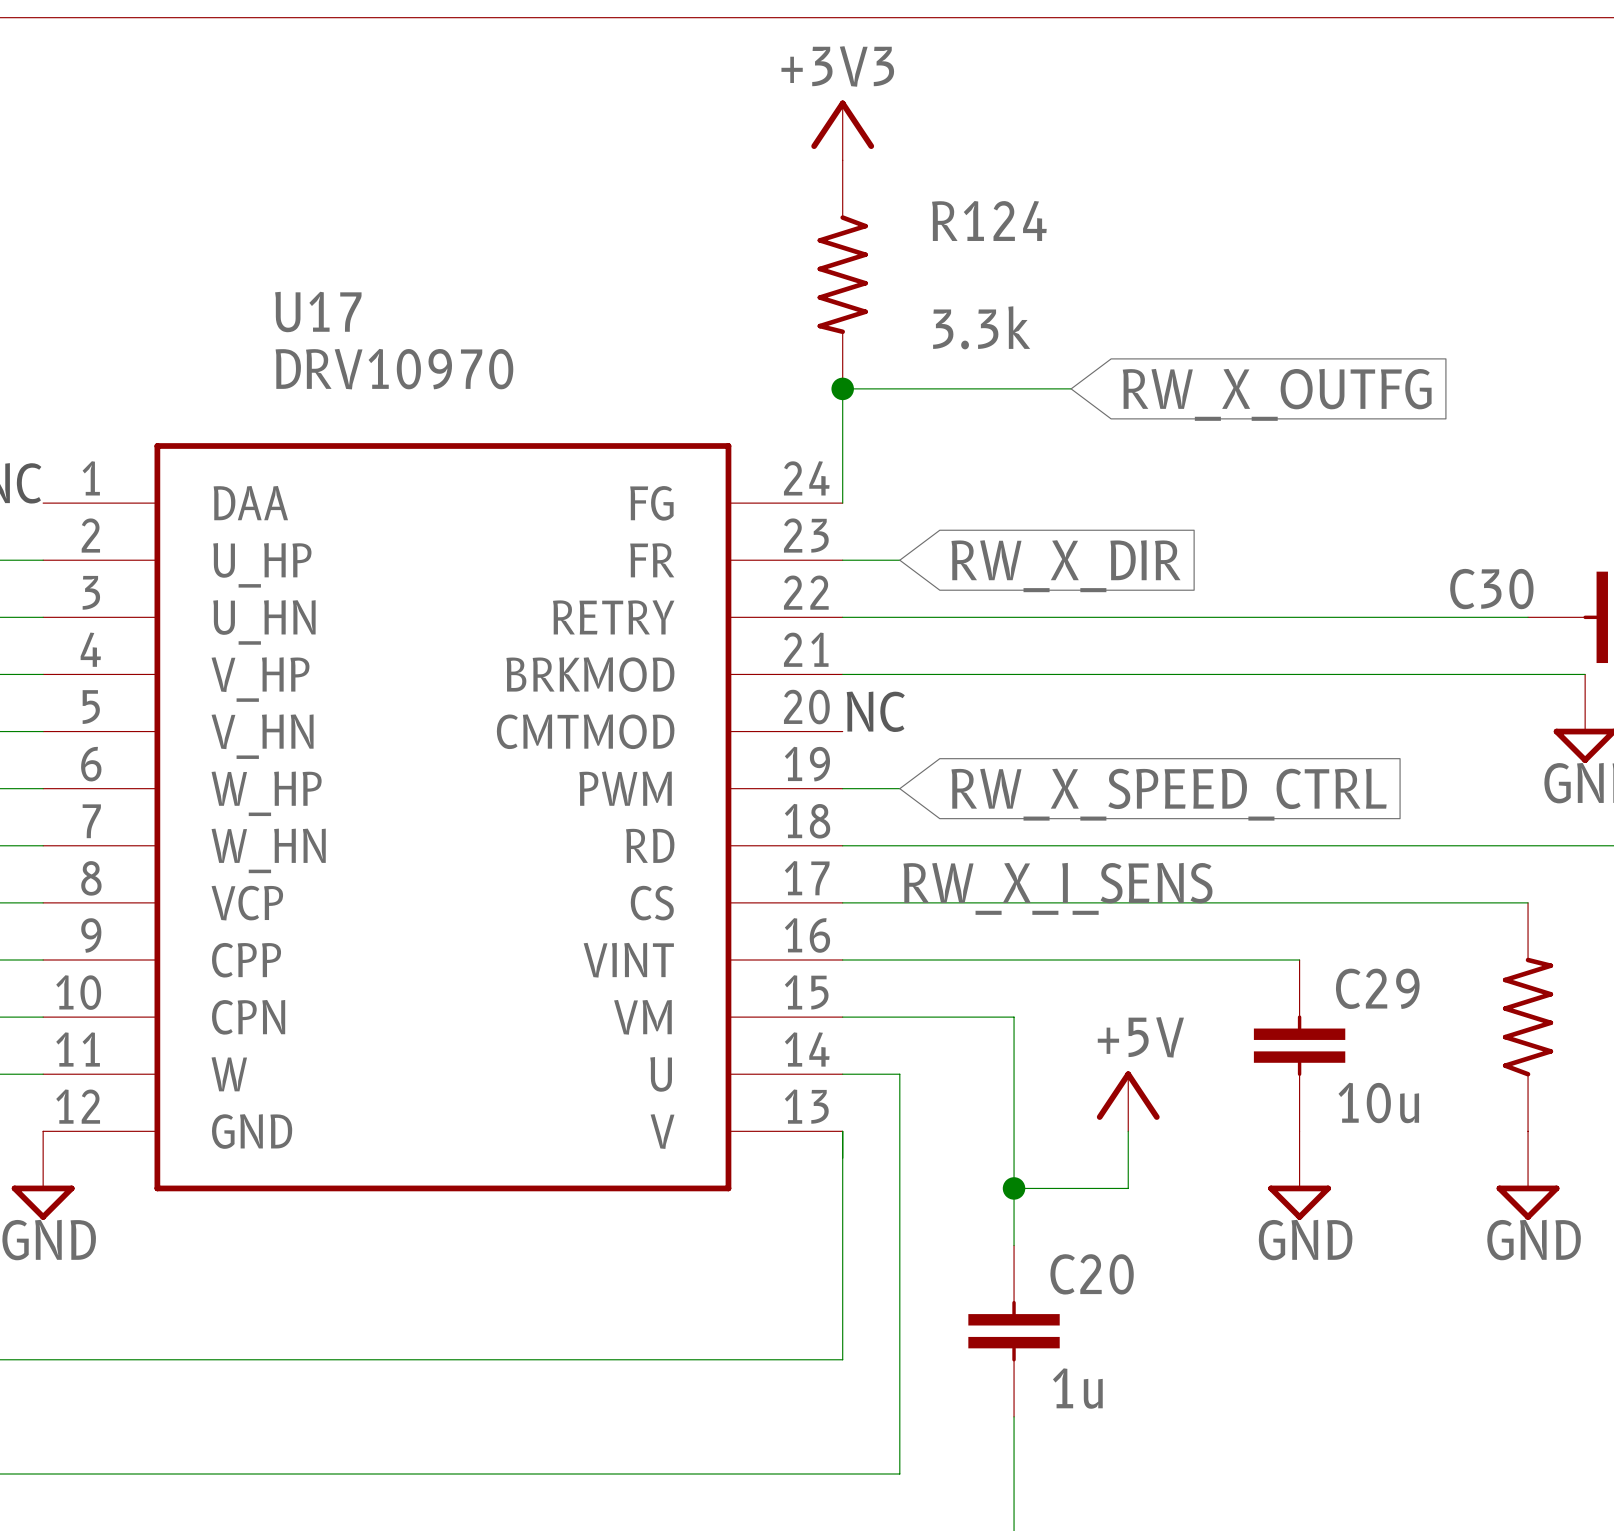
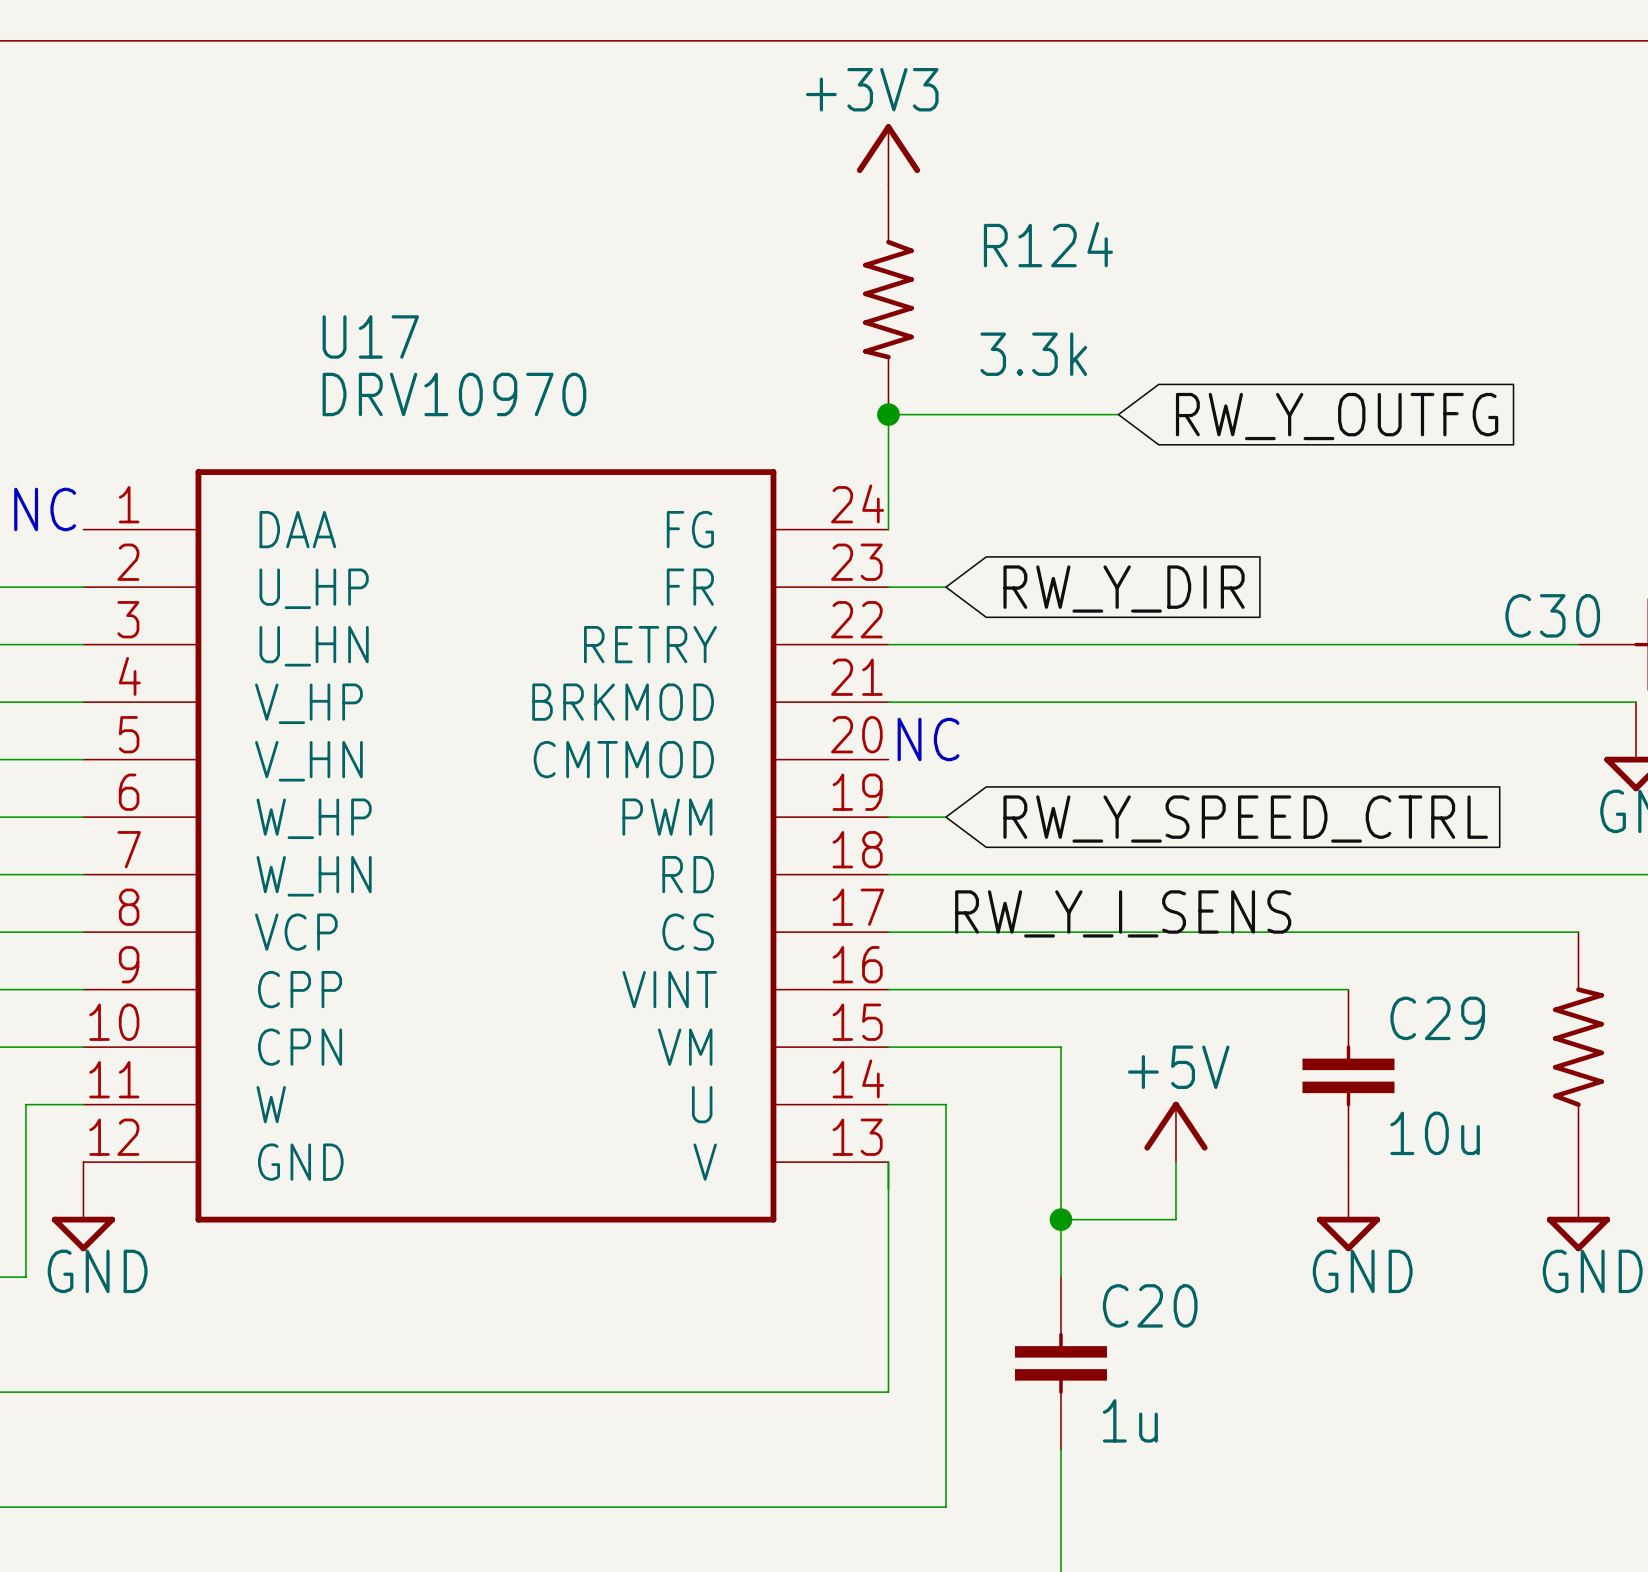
global label: RW_X_OUTFG (1277, 394) -> RW_Y_OUTFG (1337, 416)
global label: RW_X_DIR (1065, 566) -> RW_Y_DIR (1124, 589)
global label: RW_X_SPEED_CTRL (1169, 794) -> RW_Y_SPEED_CTRL (1245, 819)
label: RW_X_I_SENS (1057, 888) -> RW_Y_I_SENS (1123, 913)

